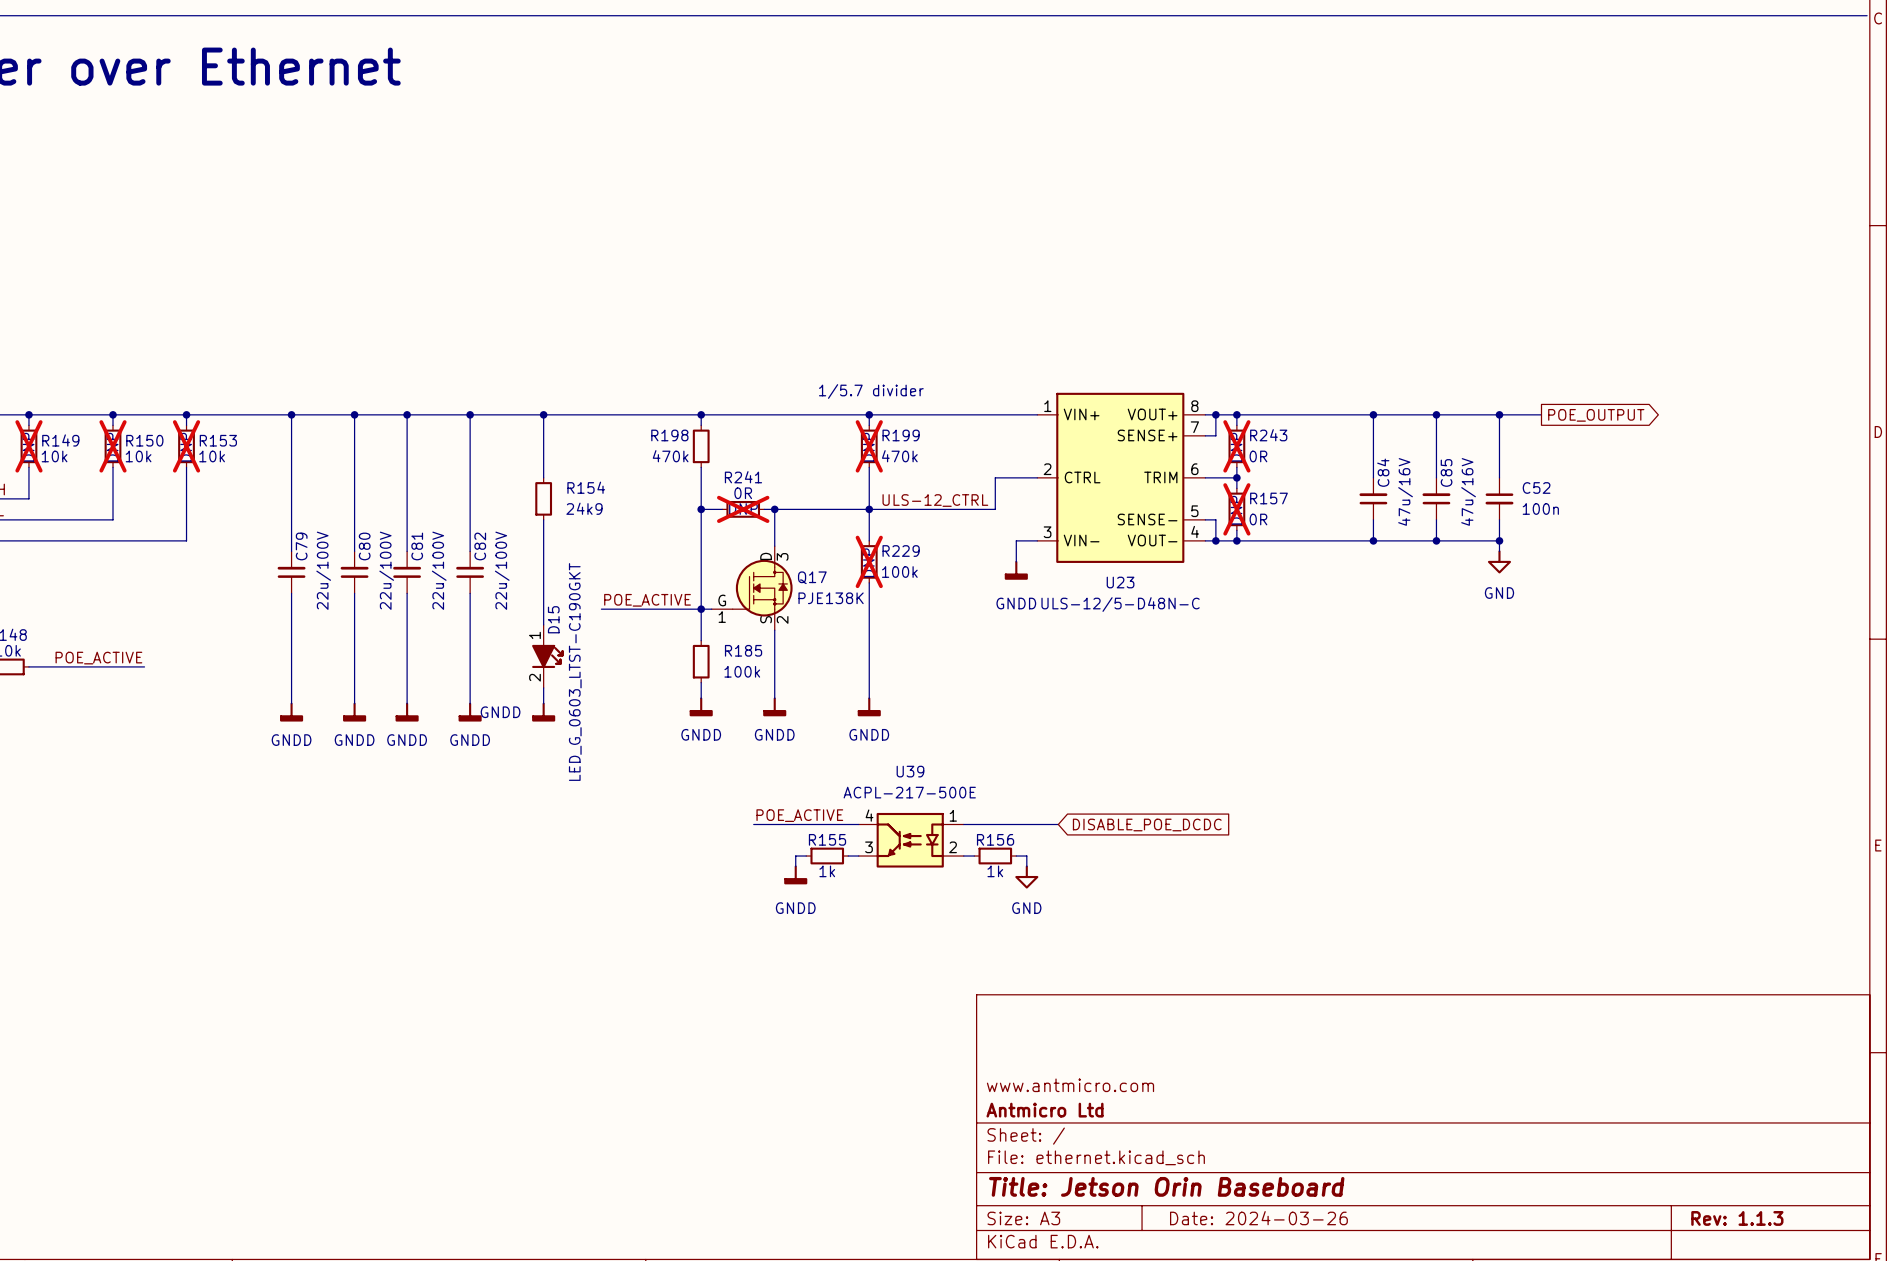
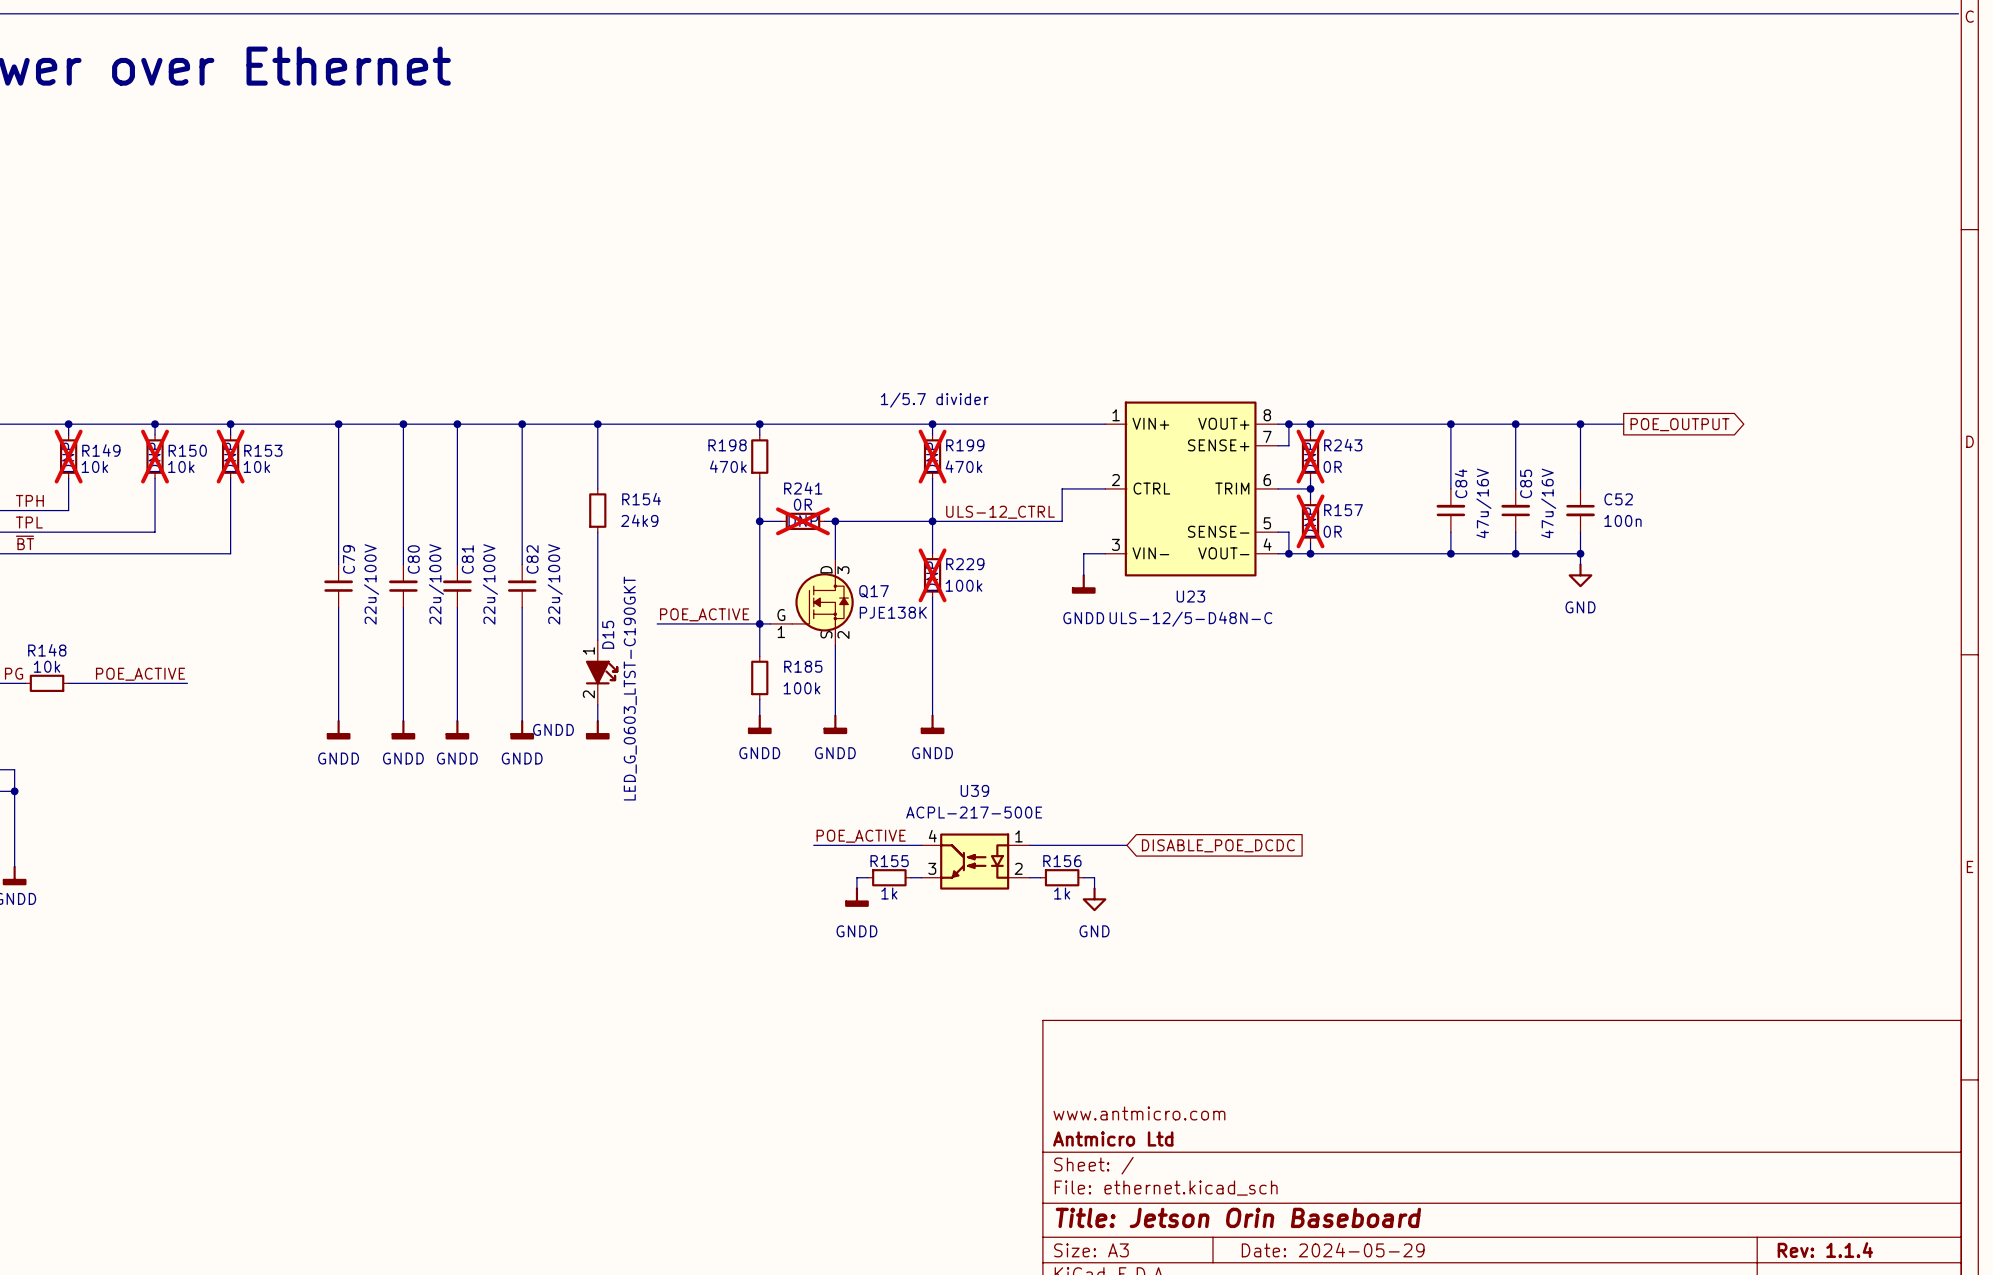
title block: Date: 2024-03-26 (1258, 1218) -> Date: 2024-05-29 (1333, 1250)
title block: Rev: 1.1.3 (1737, 1218) -> Rev: 1.1.4 (1825, 1250)

